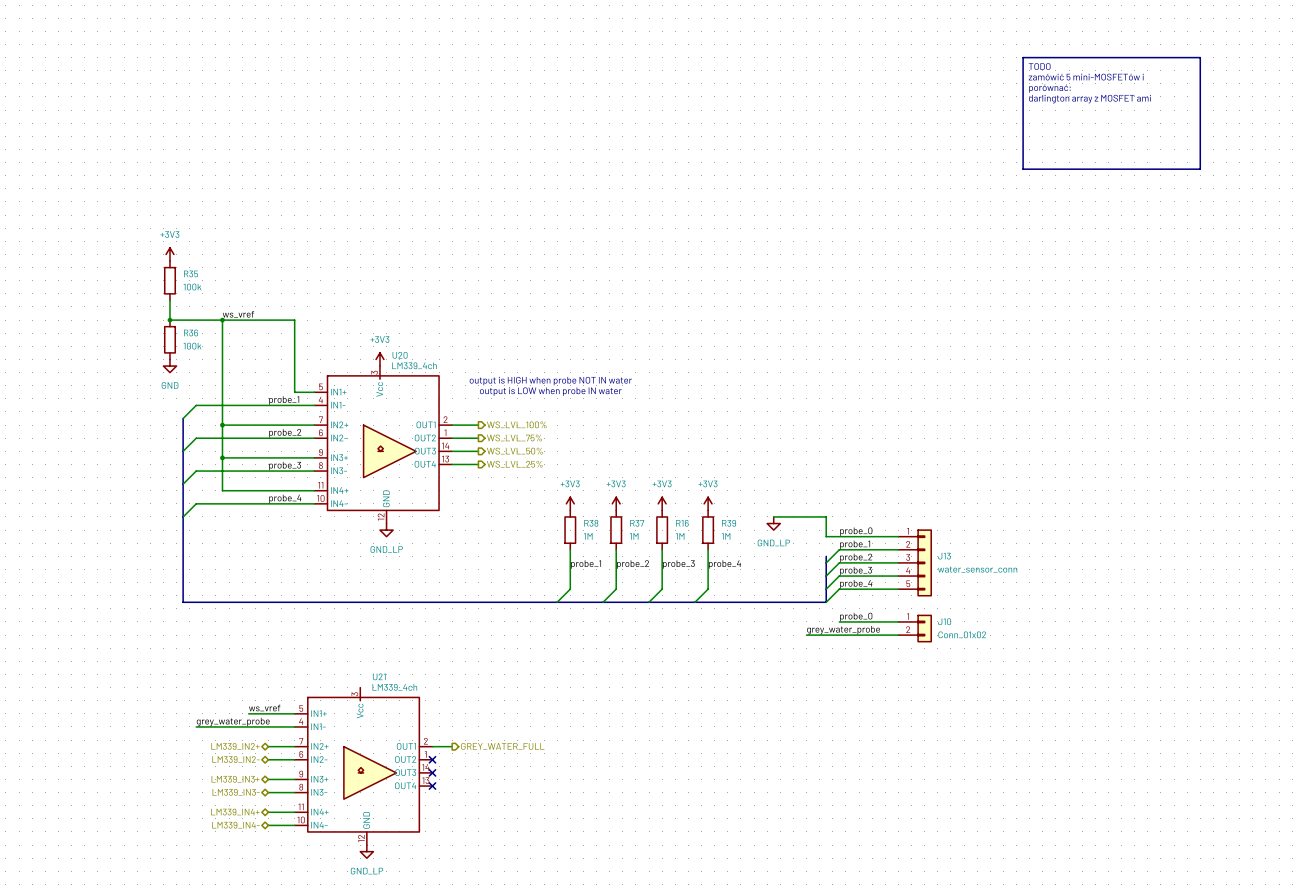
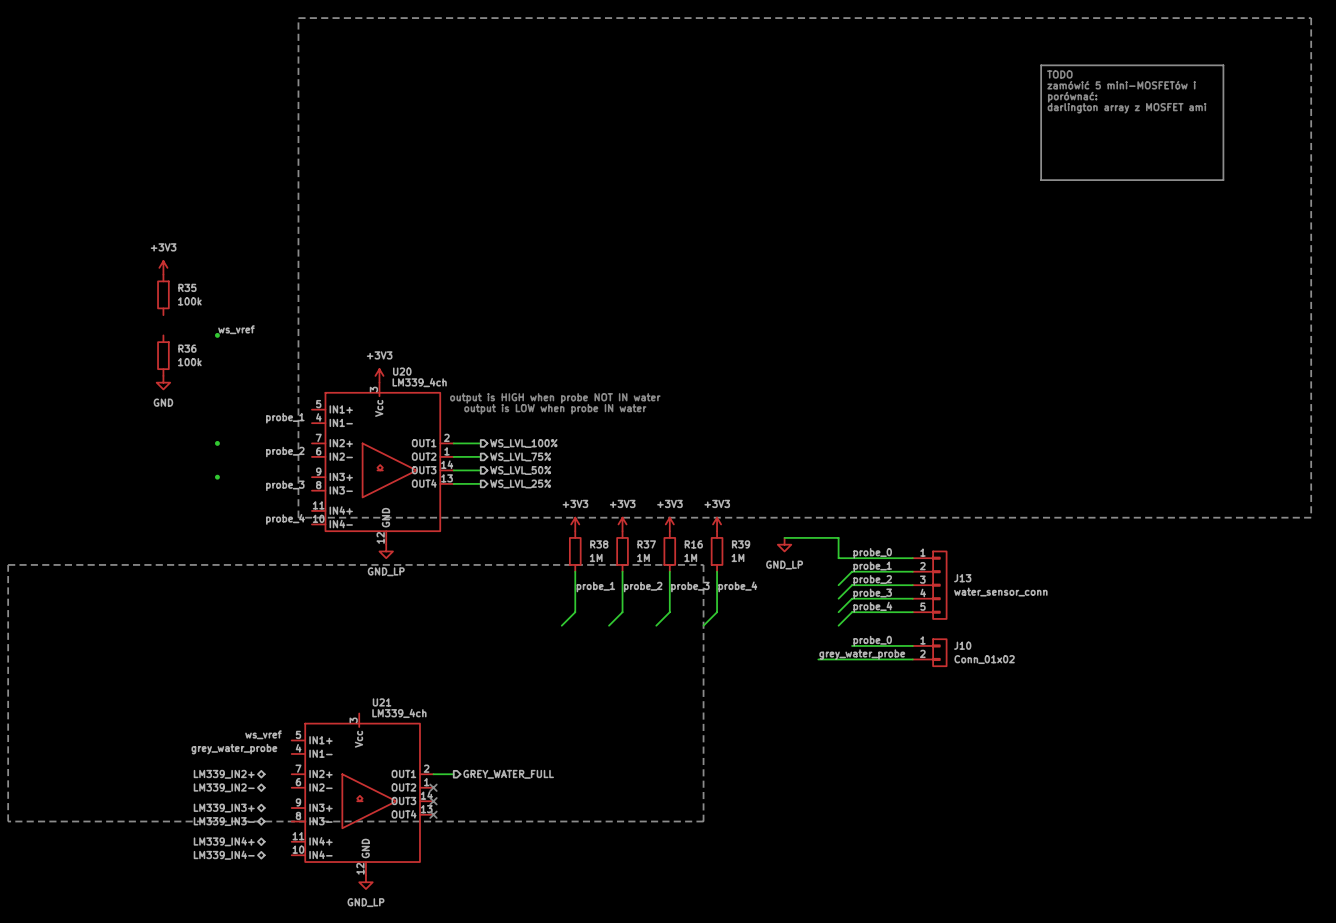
line: none -> (298, 18) (1311, 18) (1311, 517) (298, 517) (298, 18)
wire: (169, 300) (169, 320) (294, 320) (294, 392) (314, 392) -> none
junction: (169, 320) -> none
wire: (222, 320) (222, 490) (314, 490) -> none
wire: (314, 405) (196, 405) (183, 418) -> none
bus: (183, 418) (183, 602) (826, 602) (826, 556) -> none
wire: (222, 425) (314, 425) -> none
wire: (314, 438) (196, 438) (183, 451) -> none
wire: (222, 457) (314, 457) -> none
wire: (314, 471) (196, 471) (183, 484) -> none
wire: (314, 503) (196, 503) (183, 516) -> none
line: none -> (8, 564) (703, 564) (703, 821) (8, 821) (8, 564)
wire: (248, 713) (294, 713) -> none
wire: (196, 726) (294, 726) -> none
wire: (268, 746) (294, 746) -> none
wire: (268, 759) (294, 759) -> none
wire: (268, 779) (294, 779) -> none
wire: (268, 812) (294, 812) -> none
wire: (268, 825) (294, 825) -> none

